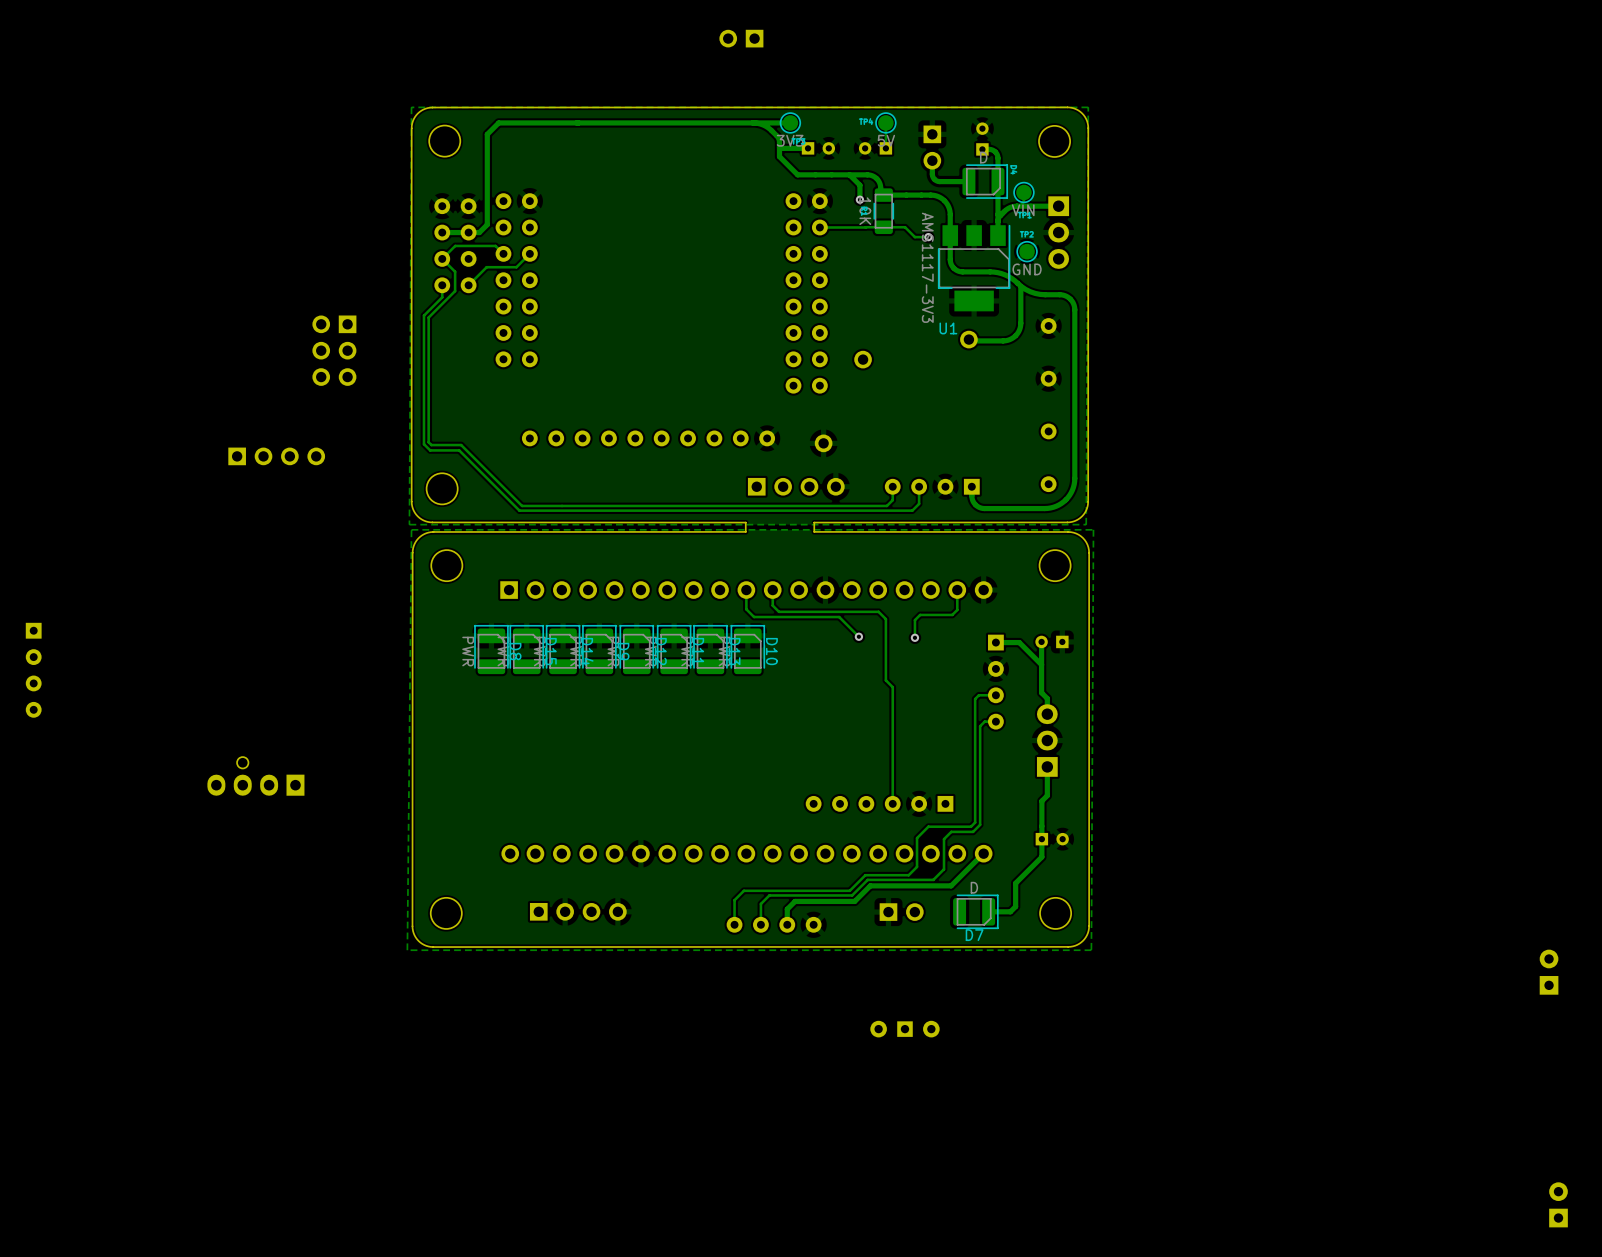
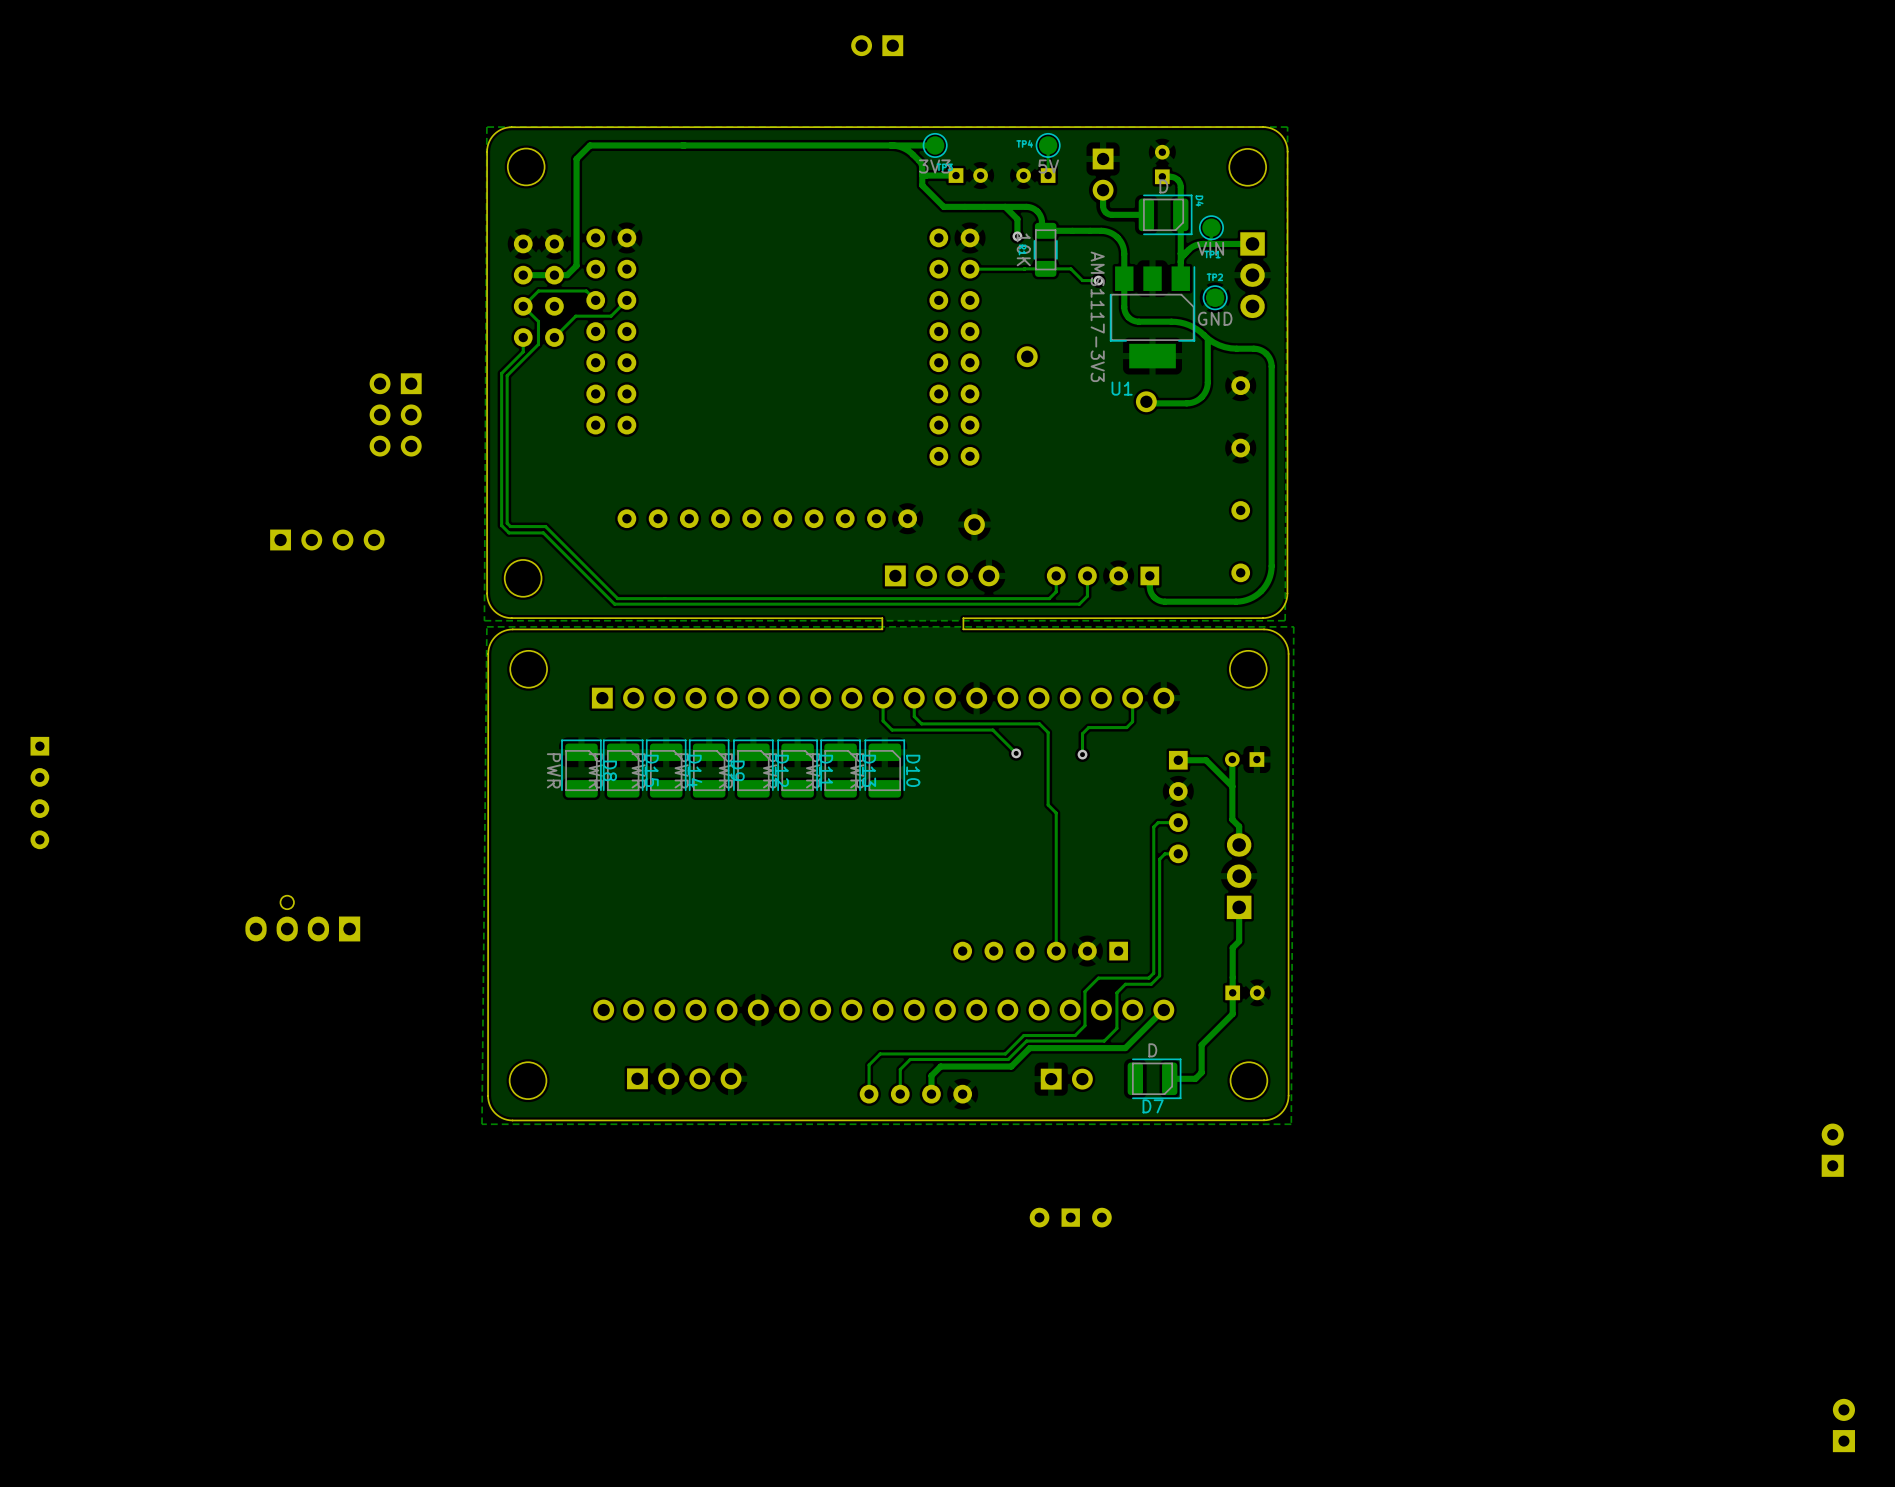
part position: (863, 359) -> (1027, 356)

